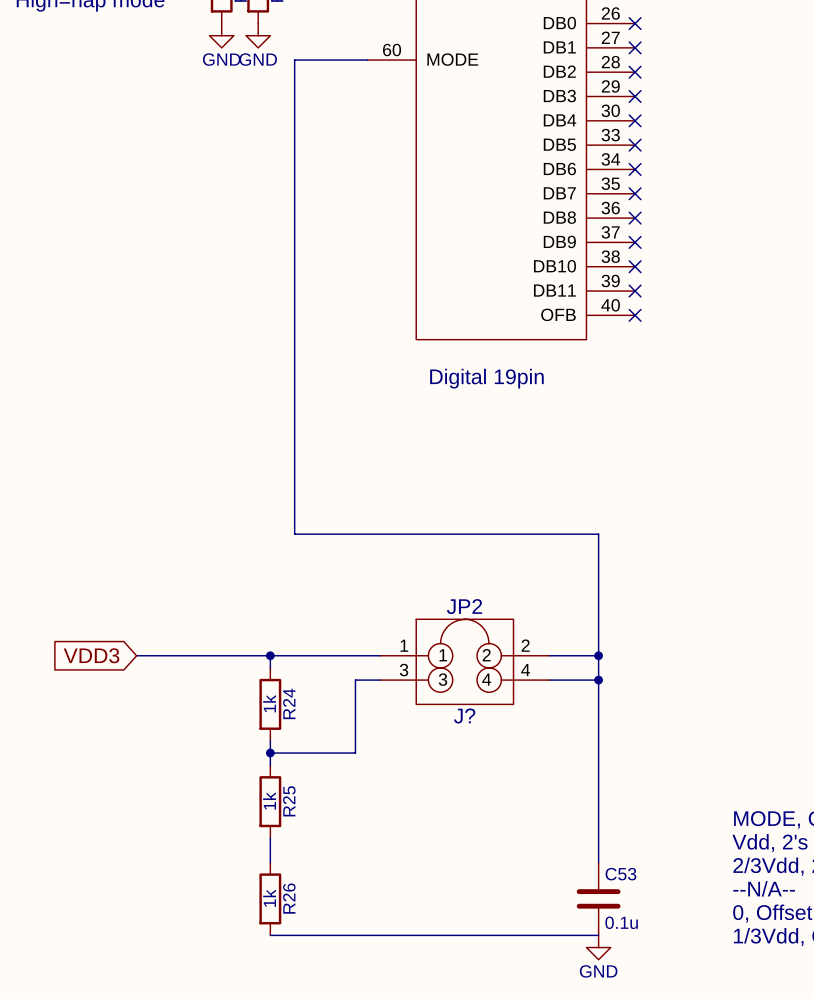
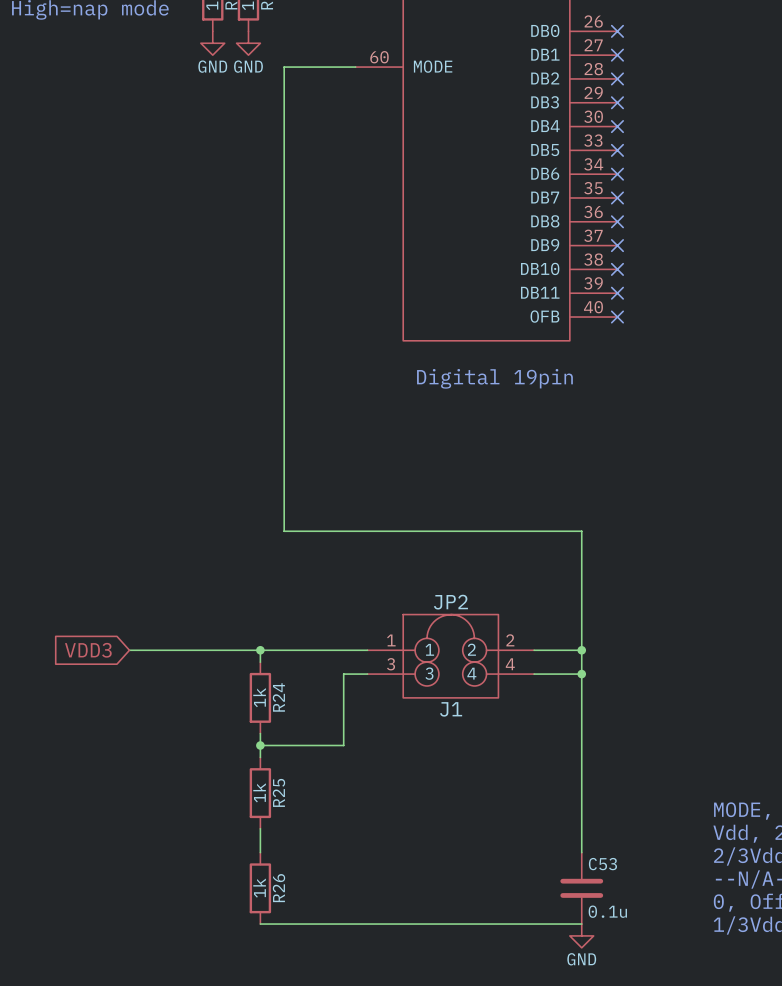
J? name: J? (464, 716) -> J1 (451, 709)

